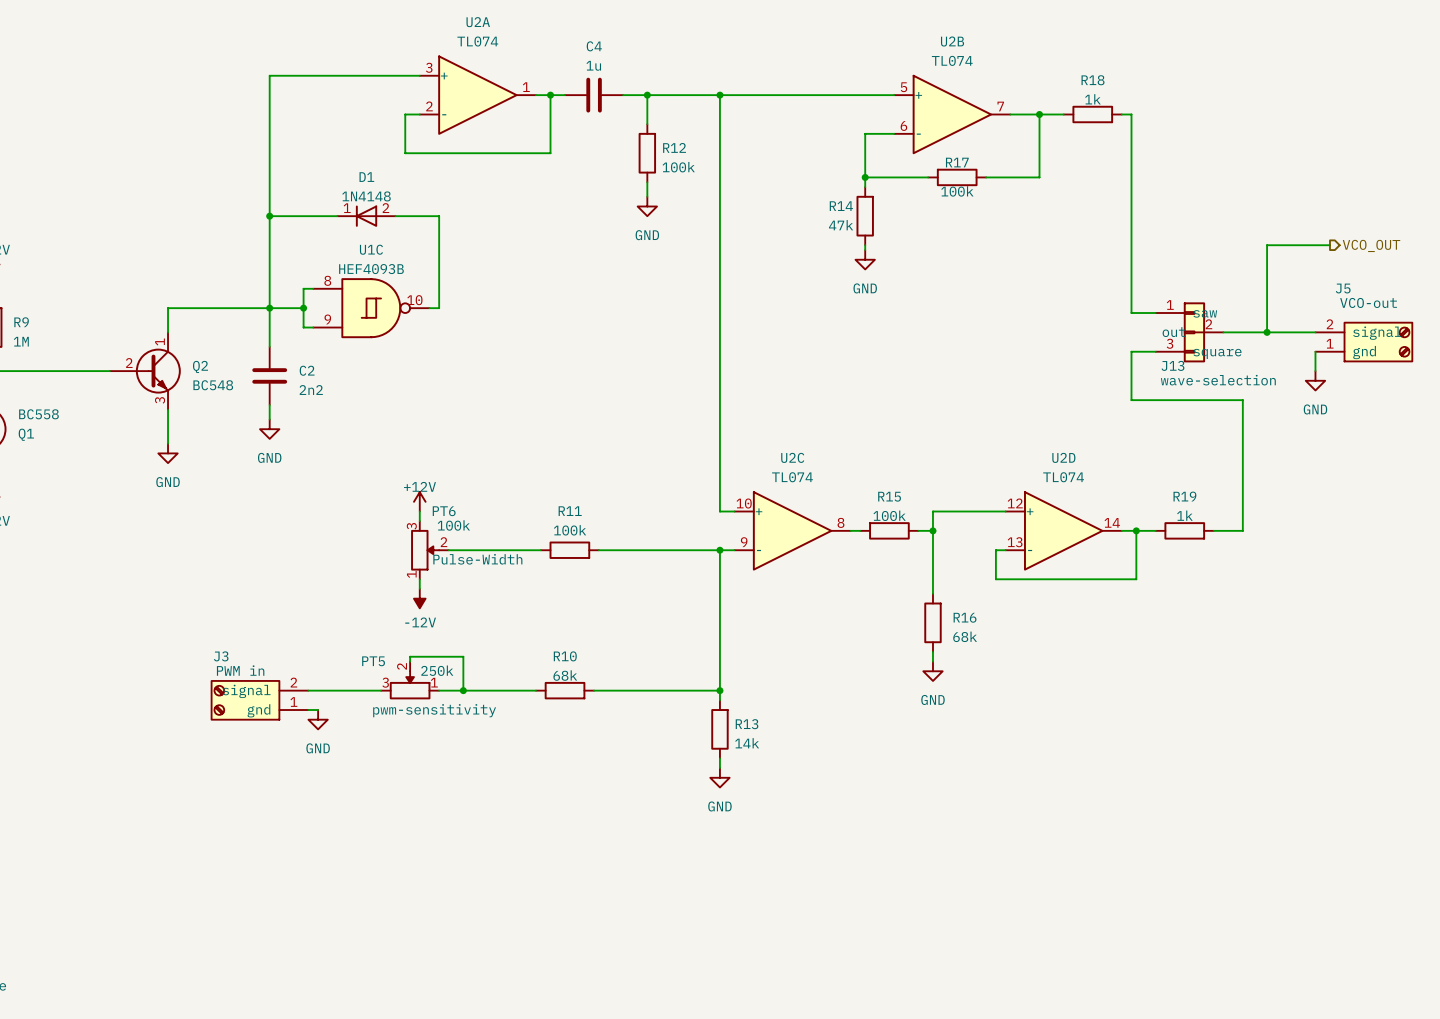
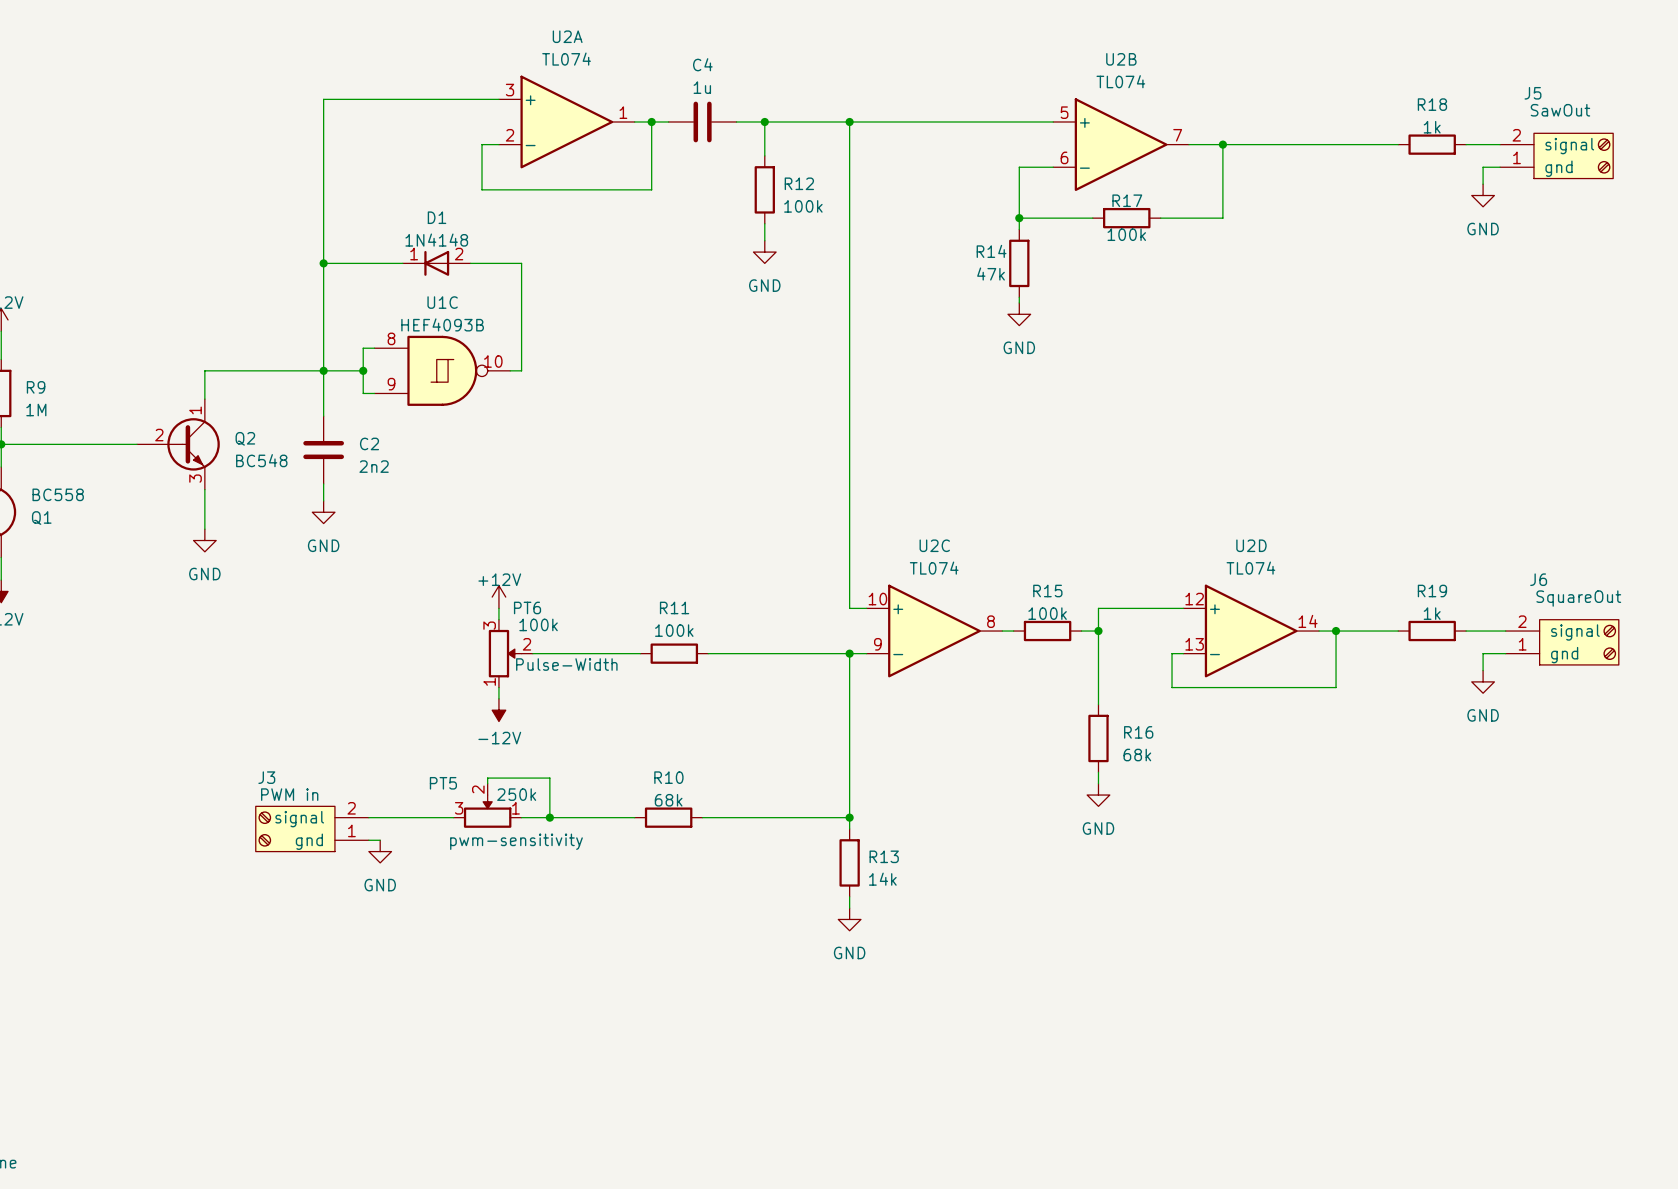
wire: none -> (1251, 144) (1319, 144)
R18 position: (1092, 114) -> (1432, 144)
wire: (1131, 114) (1131, 313) (1155, 313) -> (1330, 144) (1398, 144)
wire: none -> (1466, 144) (1500, 144)
wire: none -> (1500, 167) (1483, 167) (1483, 184)
power symbol: none -> GND (1483, 195)
wire: (1330, 245) (1267, 245) (1267, 332) -> none
hierarchical label: VCO_OUT (1371, 245) -> none
J5 value: VCO-out (1368, 302) -> SawOut (1560, 110)
J13: wave-selection (1189, 332) -> none
wire: (1223, 332) (1315, 332) -> none
junction: (1267, 332) -> none
J5 position: (1363, 342) -> (1556, 155)
wire: (1155, 351) (1131, 351) (1131, 400) (1242, 400) (1242, 530) (1213, 530) -> none
wire: (1315, 351) (1315, 371) -> none
power symbol: GND (1315, 380) -> none
wire: none -> (1358, 631) (1398, 631)
R19 position: (1184, 530) -> (1432, 631)
wire: none -> (1466, 631) (1505, 631)
J6: none -> SquareOut (1562, 642)
wire: none -> (1505, 653) (1483, 653) (1483, 670)
power symbol: none -> GND (1483, 681)

